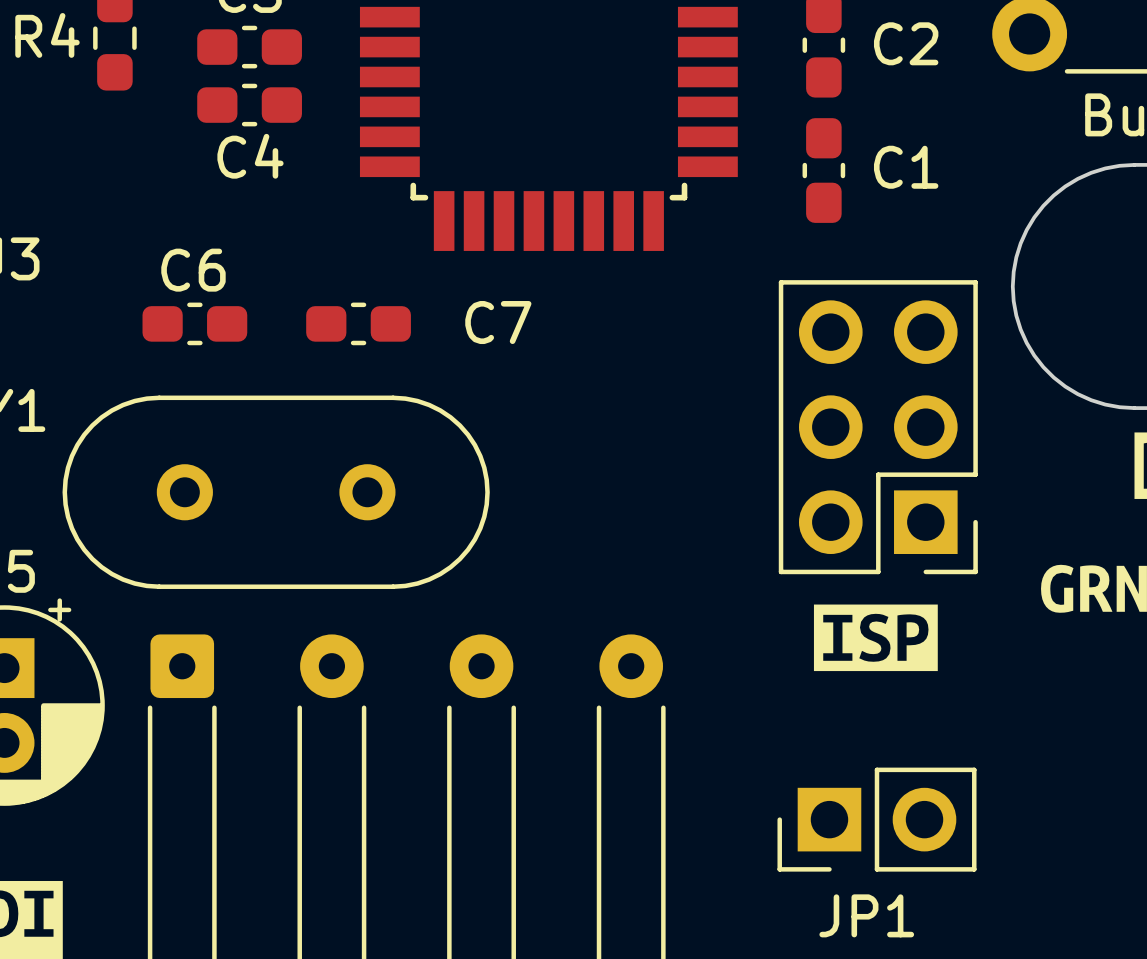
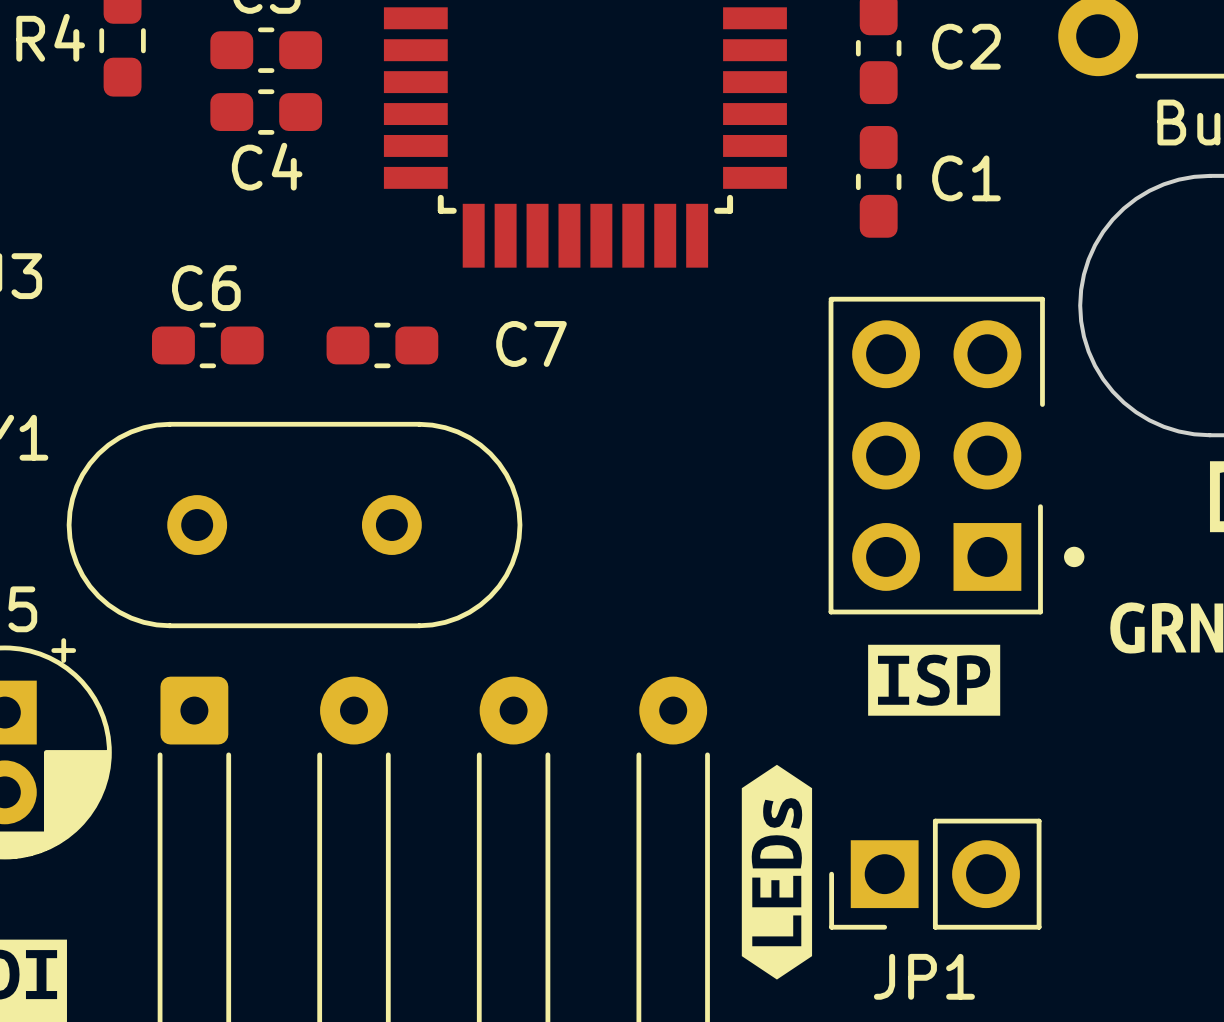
part footprint: [778, 280, 978, 575] -> [828, 296, 1045, 615]
drawing: none -> [1064, 546, 1085, 568]
drawing: none -> [741, 764, 813, 980]

